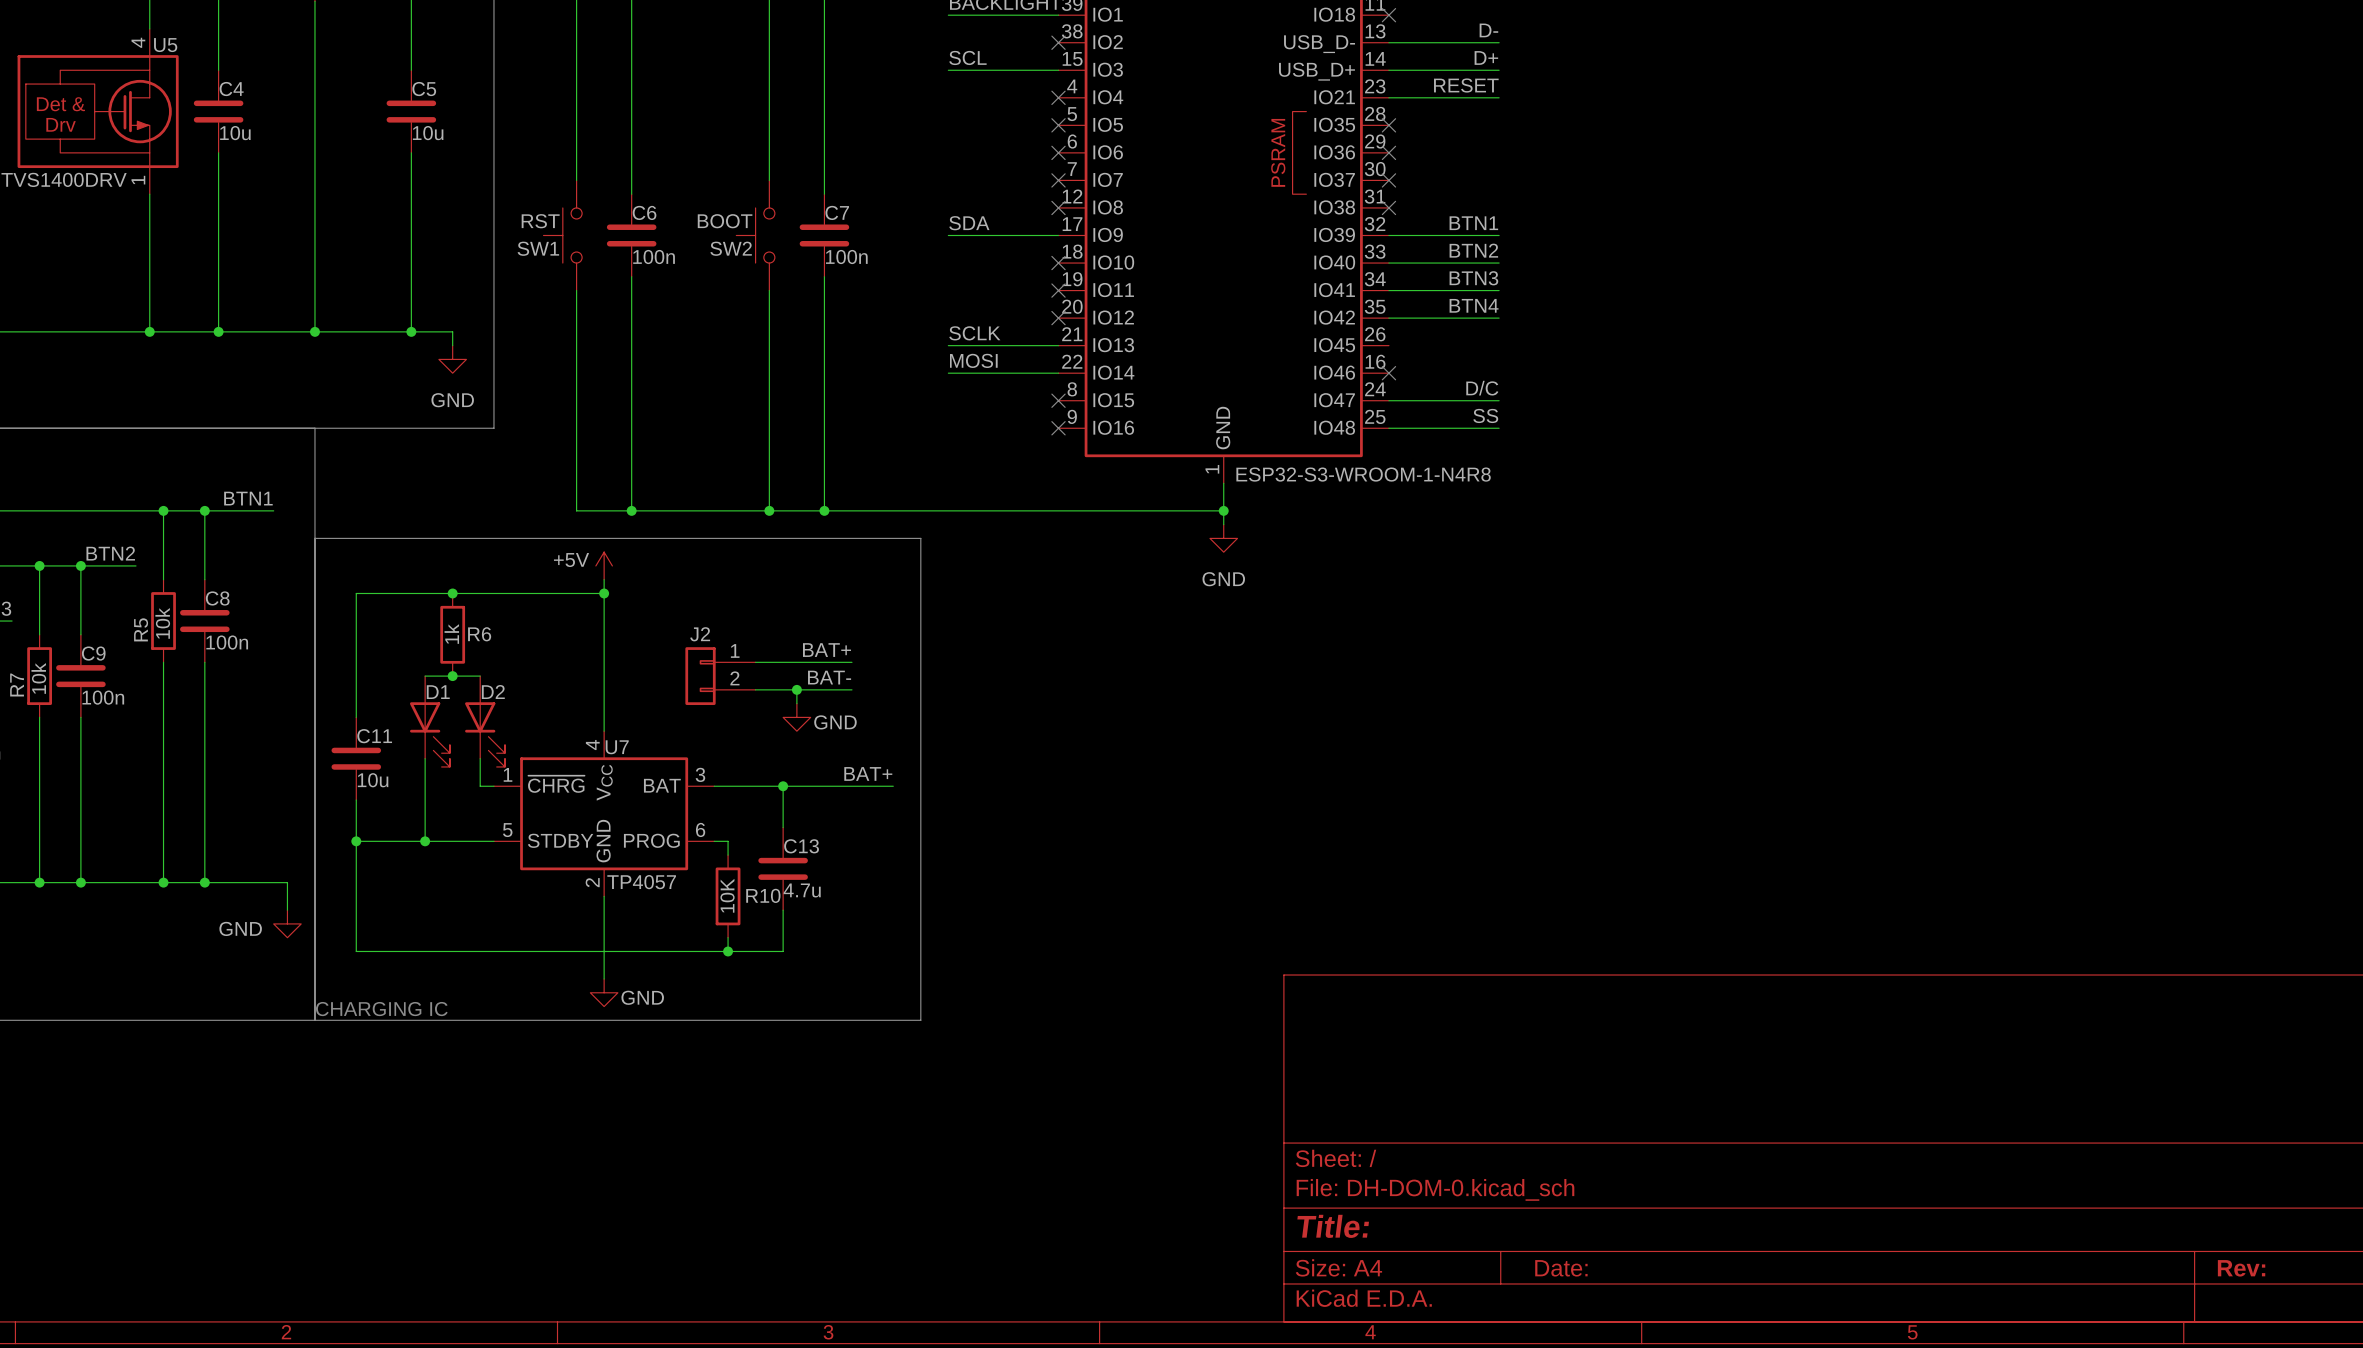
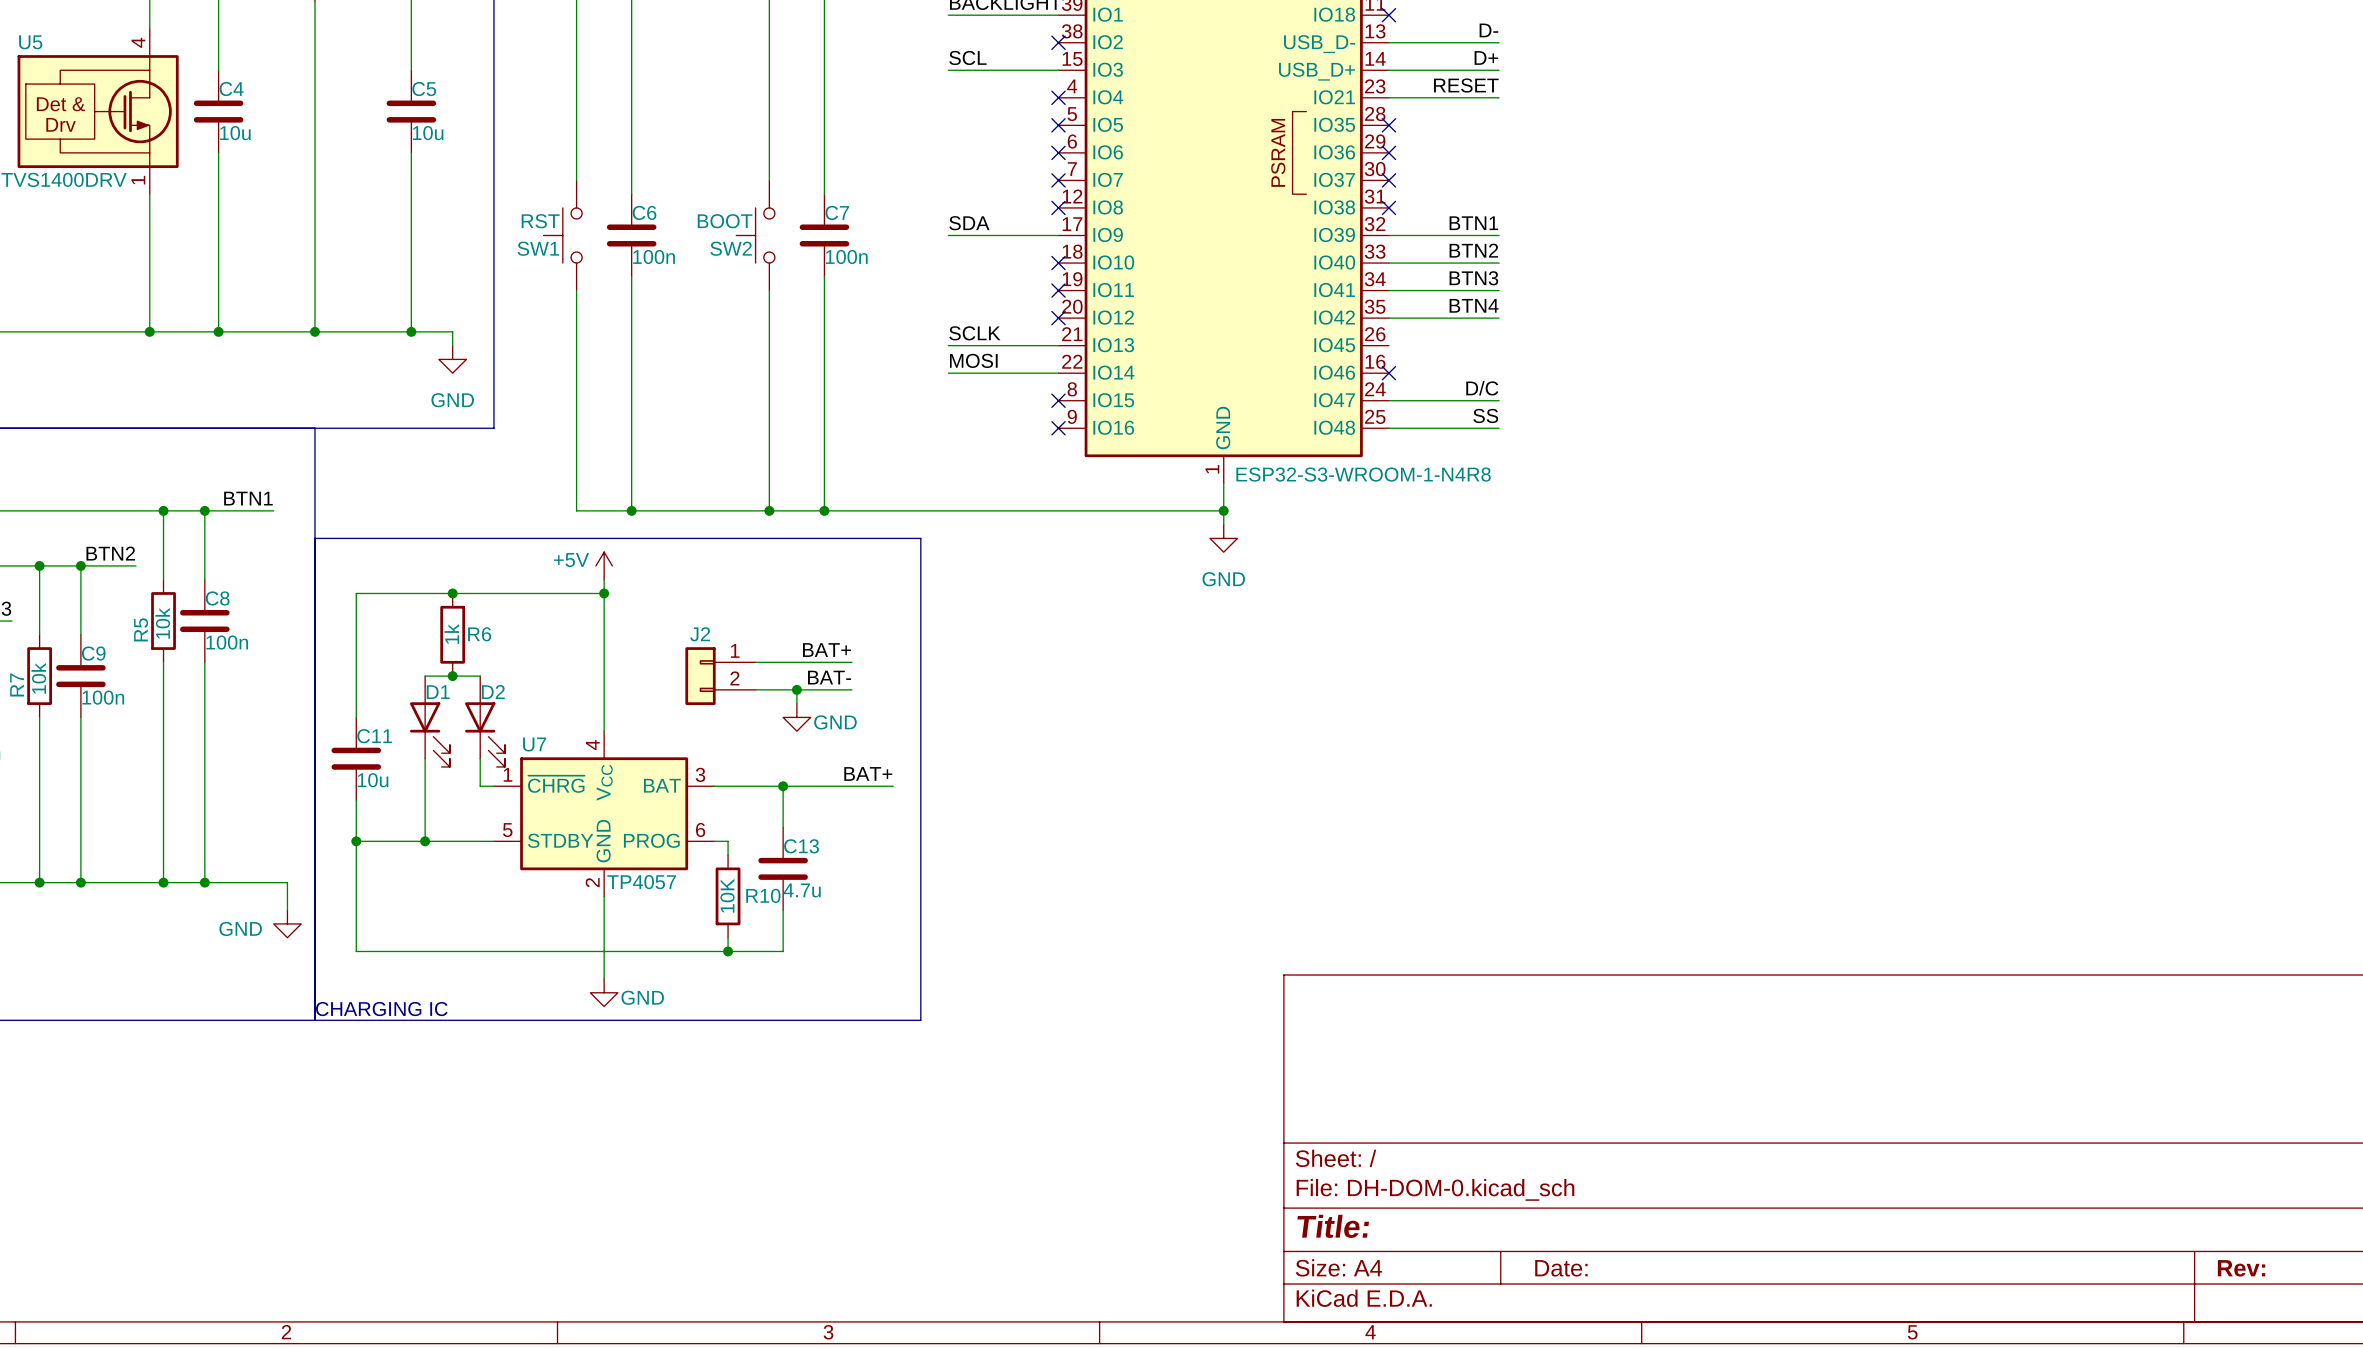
U5 name position: U5 (165, 45) -> U5 (30, 42)
U7 name position: U7 (617, 747) -> U7 (534, 744)

